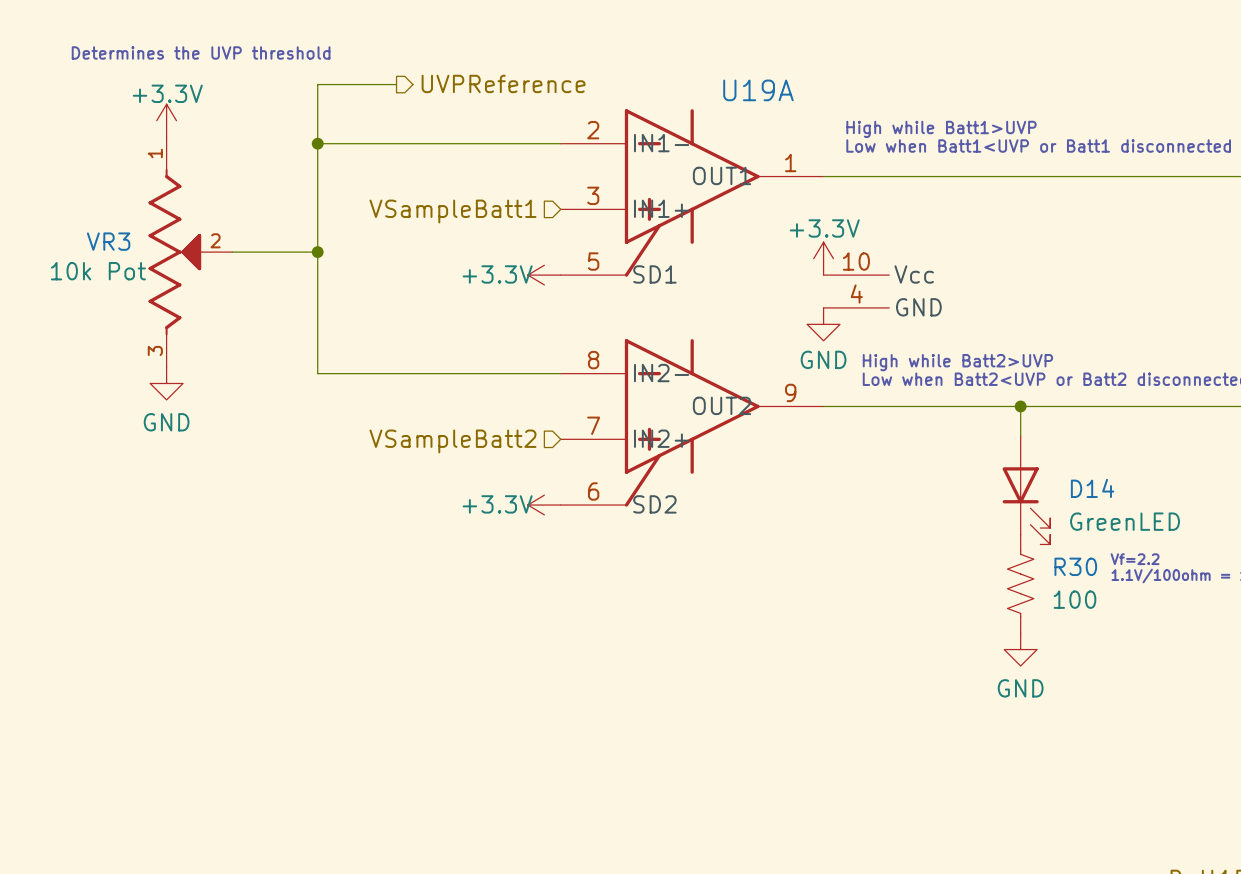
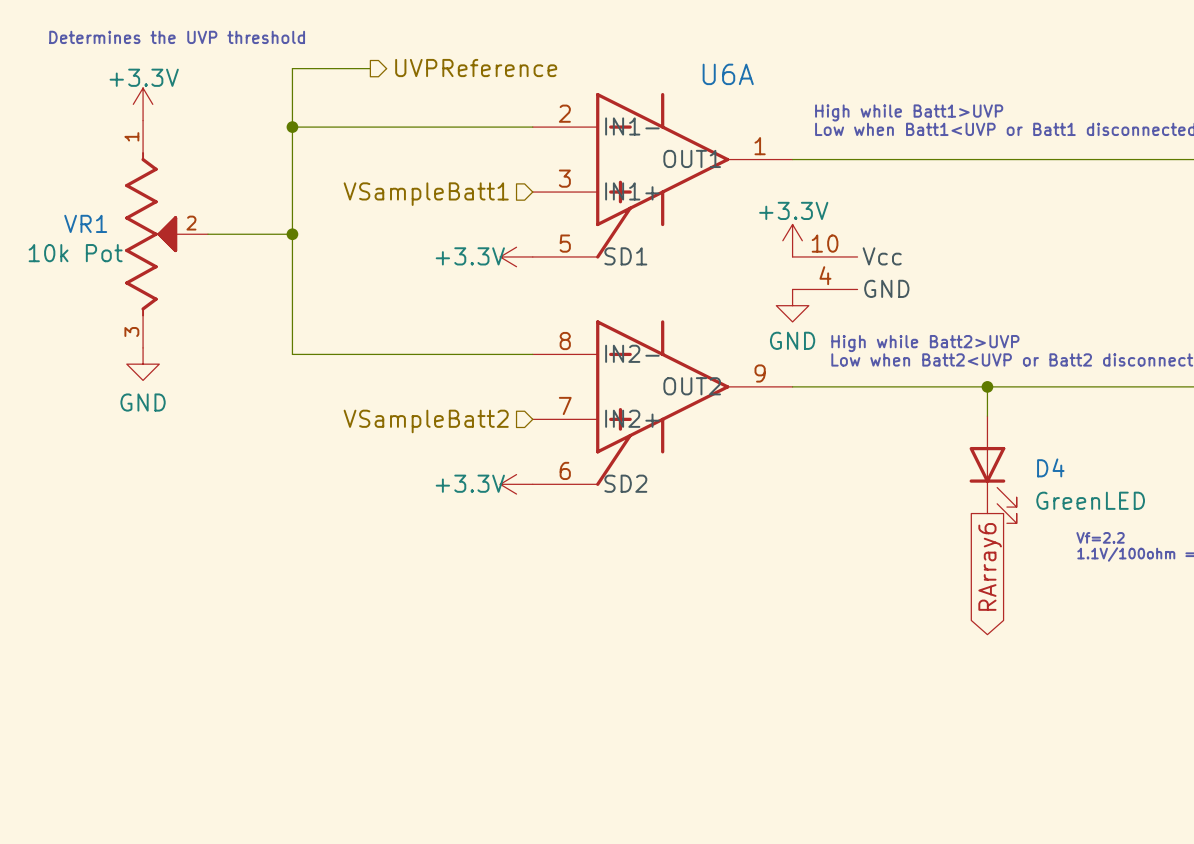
U19A name: U19A (758, 90) -> U6A (728, 74)
VR3 name: VR3 (108, 241) -> VR1 (85, 223)
D14 name: D14 (1092, 488) -> D4 (1050, 467)
R30: 100 (1020, 583) -> none
global label: none -> RArray6 (990, 566)
power symbol: GND (1020, 649) -> none

